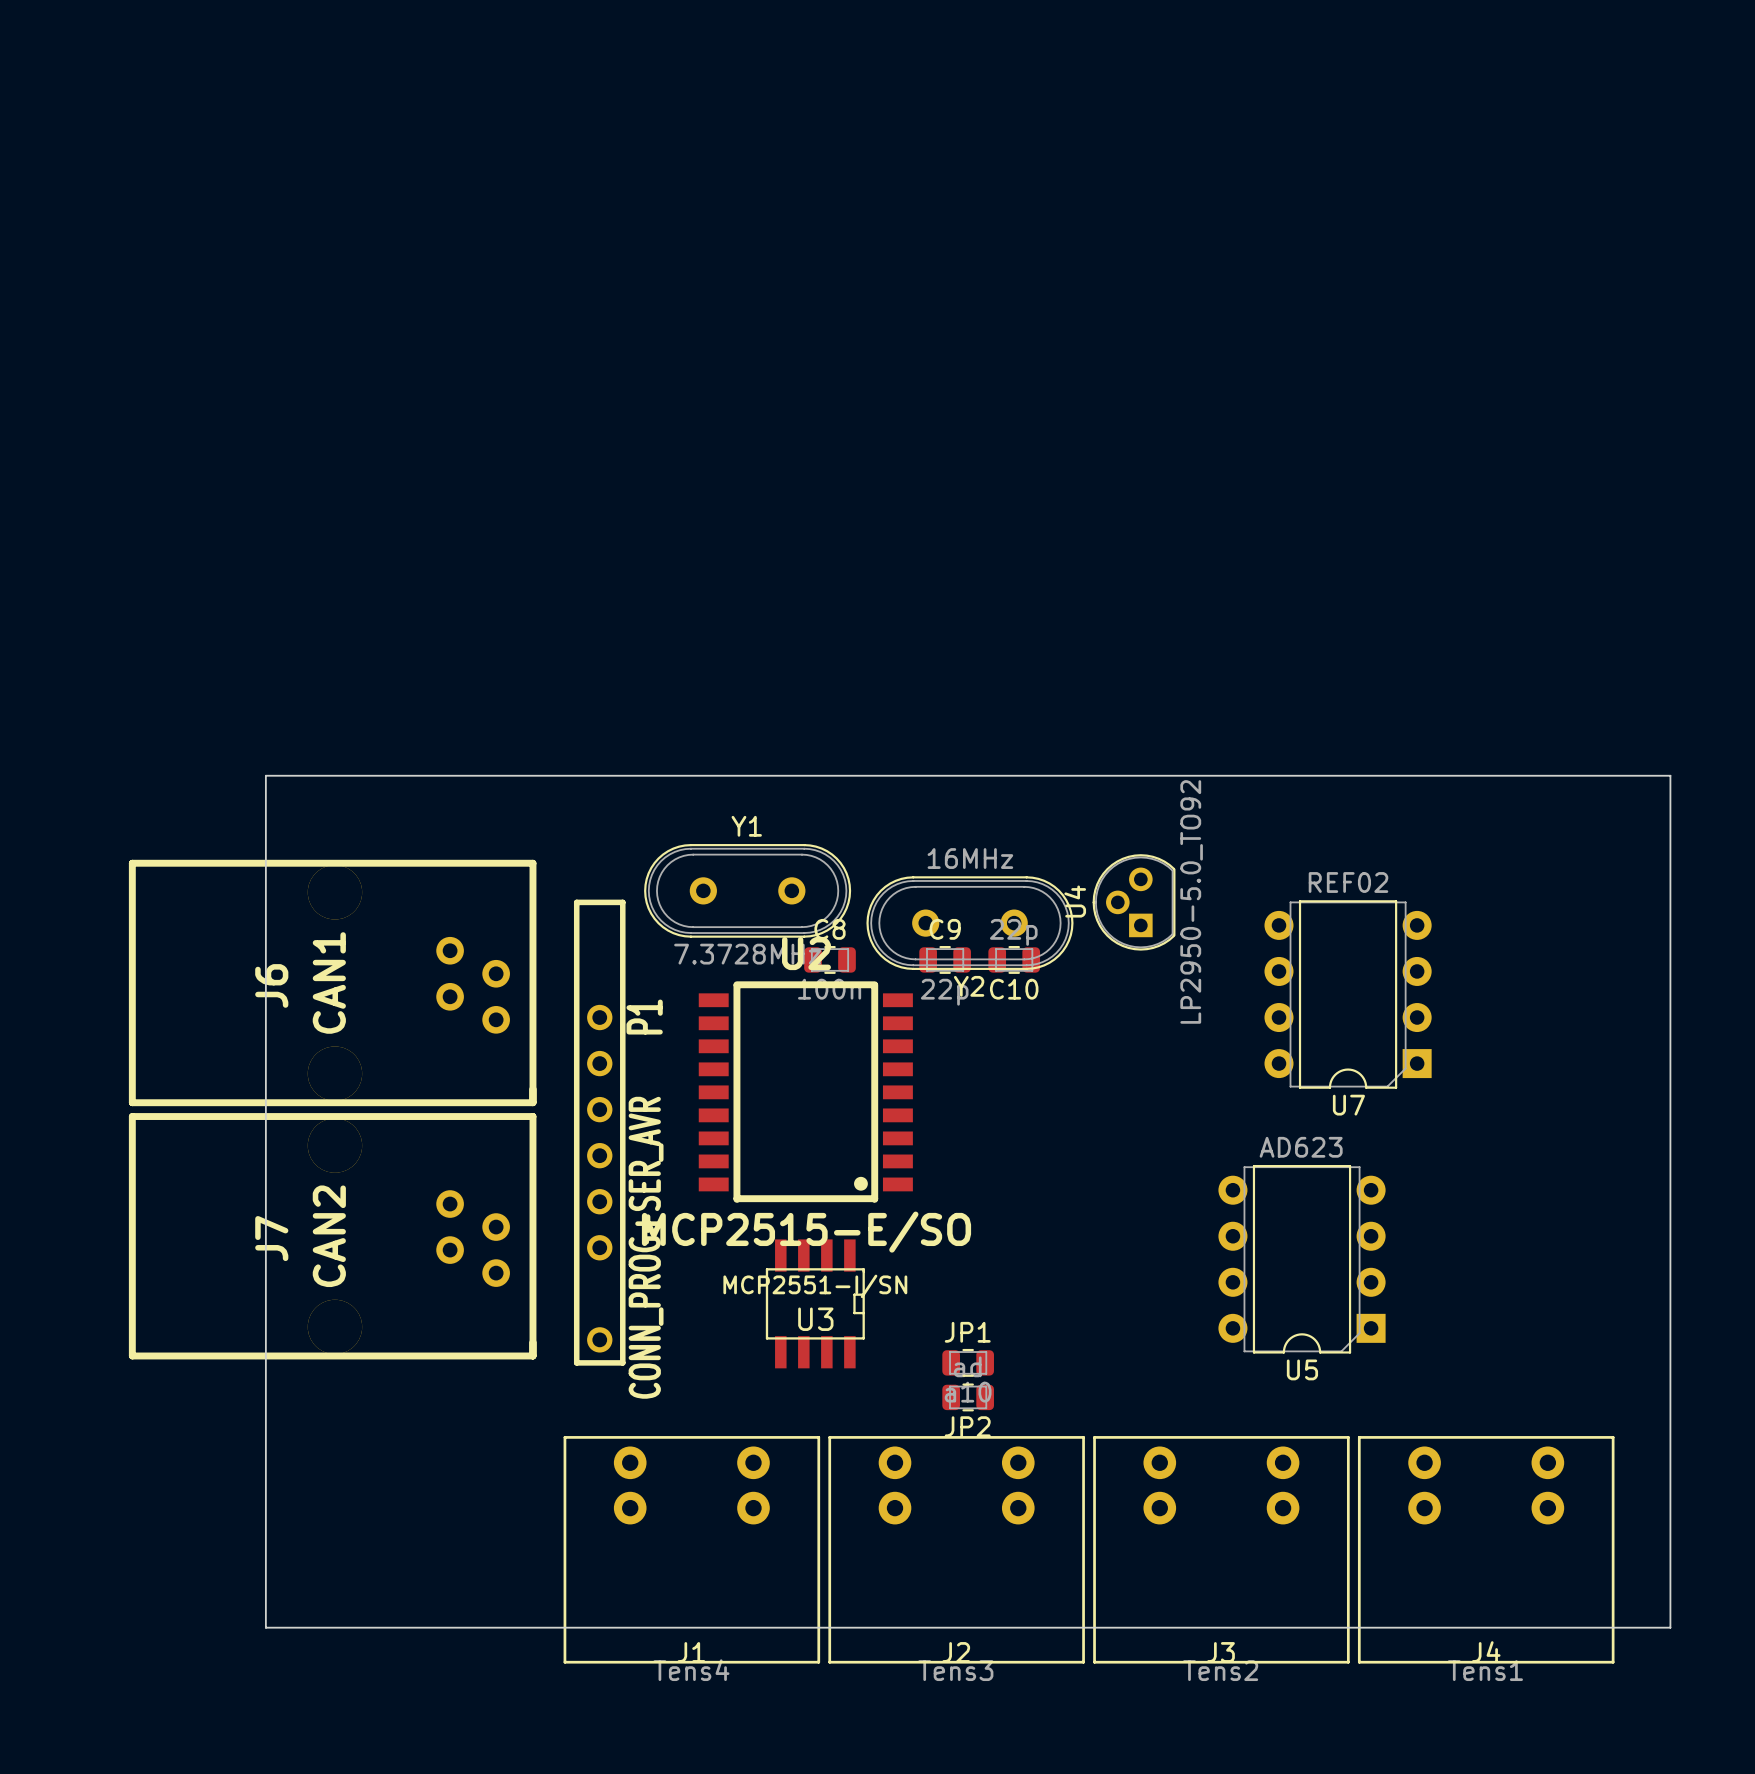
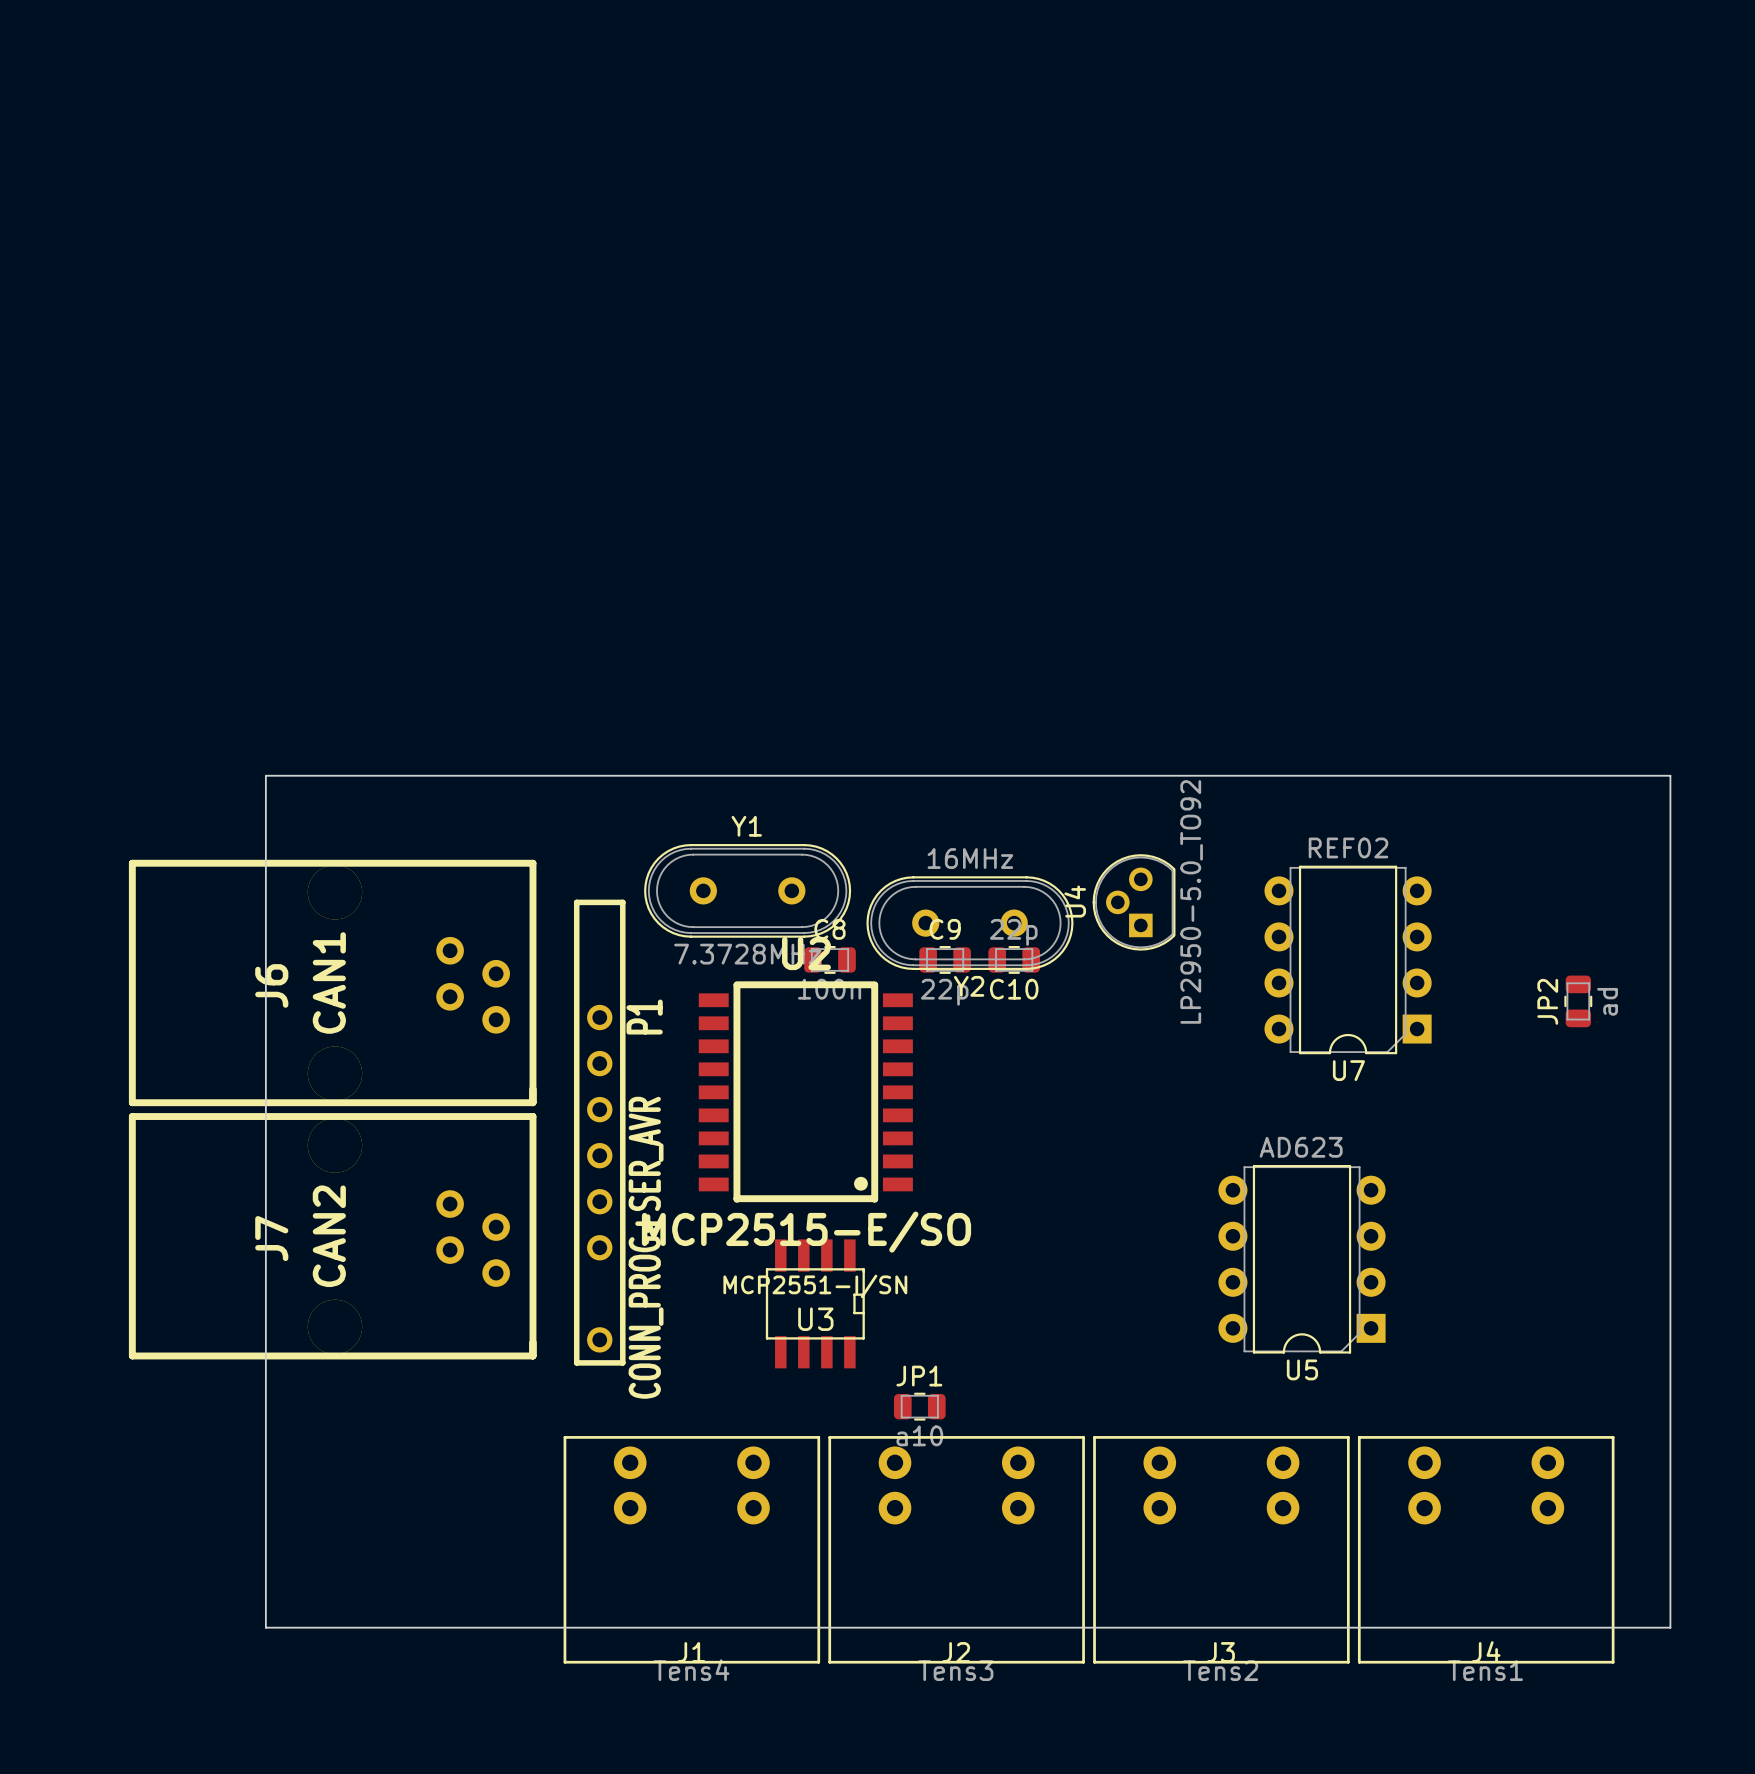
U7 position: (1348, 994) -> (1348, 959)
JP1 position: (968, 1362) -> (919, 1406)
JP2 rotation: 0° (968, 1397) -> 90° clockwise (1578, 1001)
JP2 position: (968, 1397) -> (1578, 1001)

